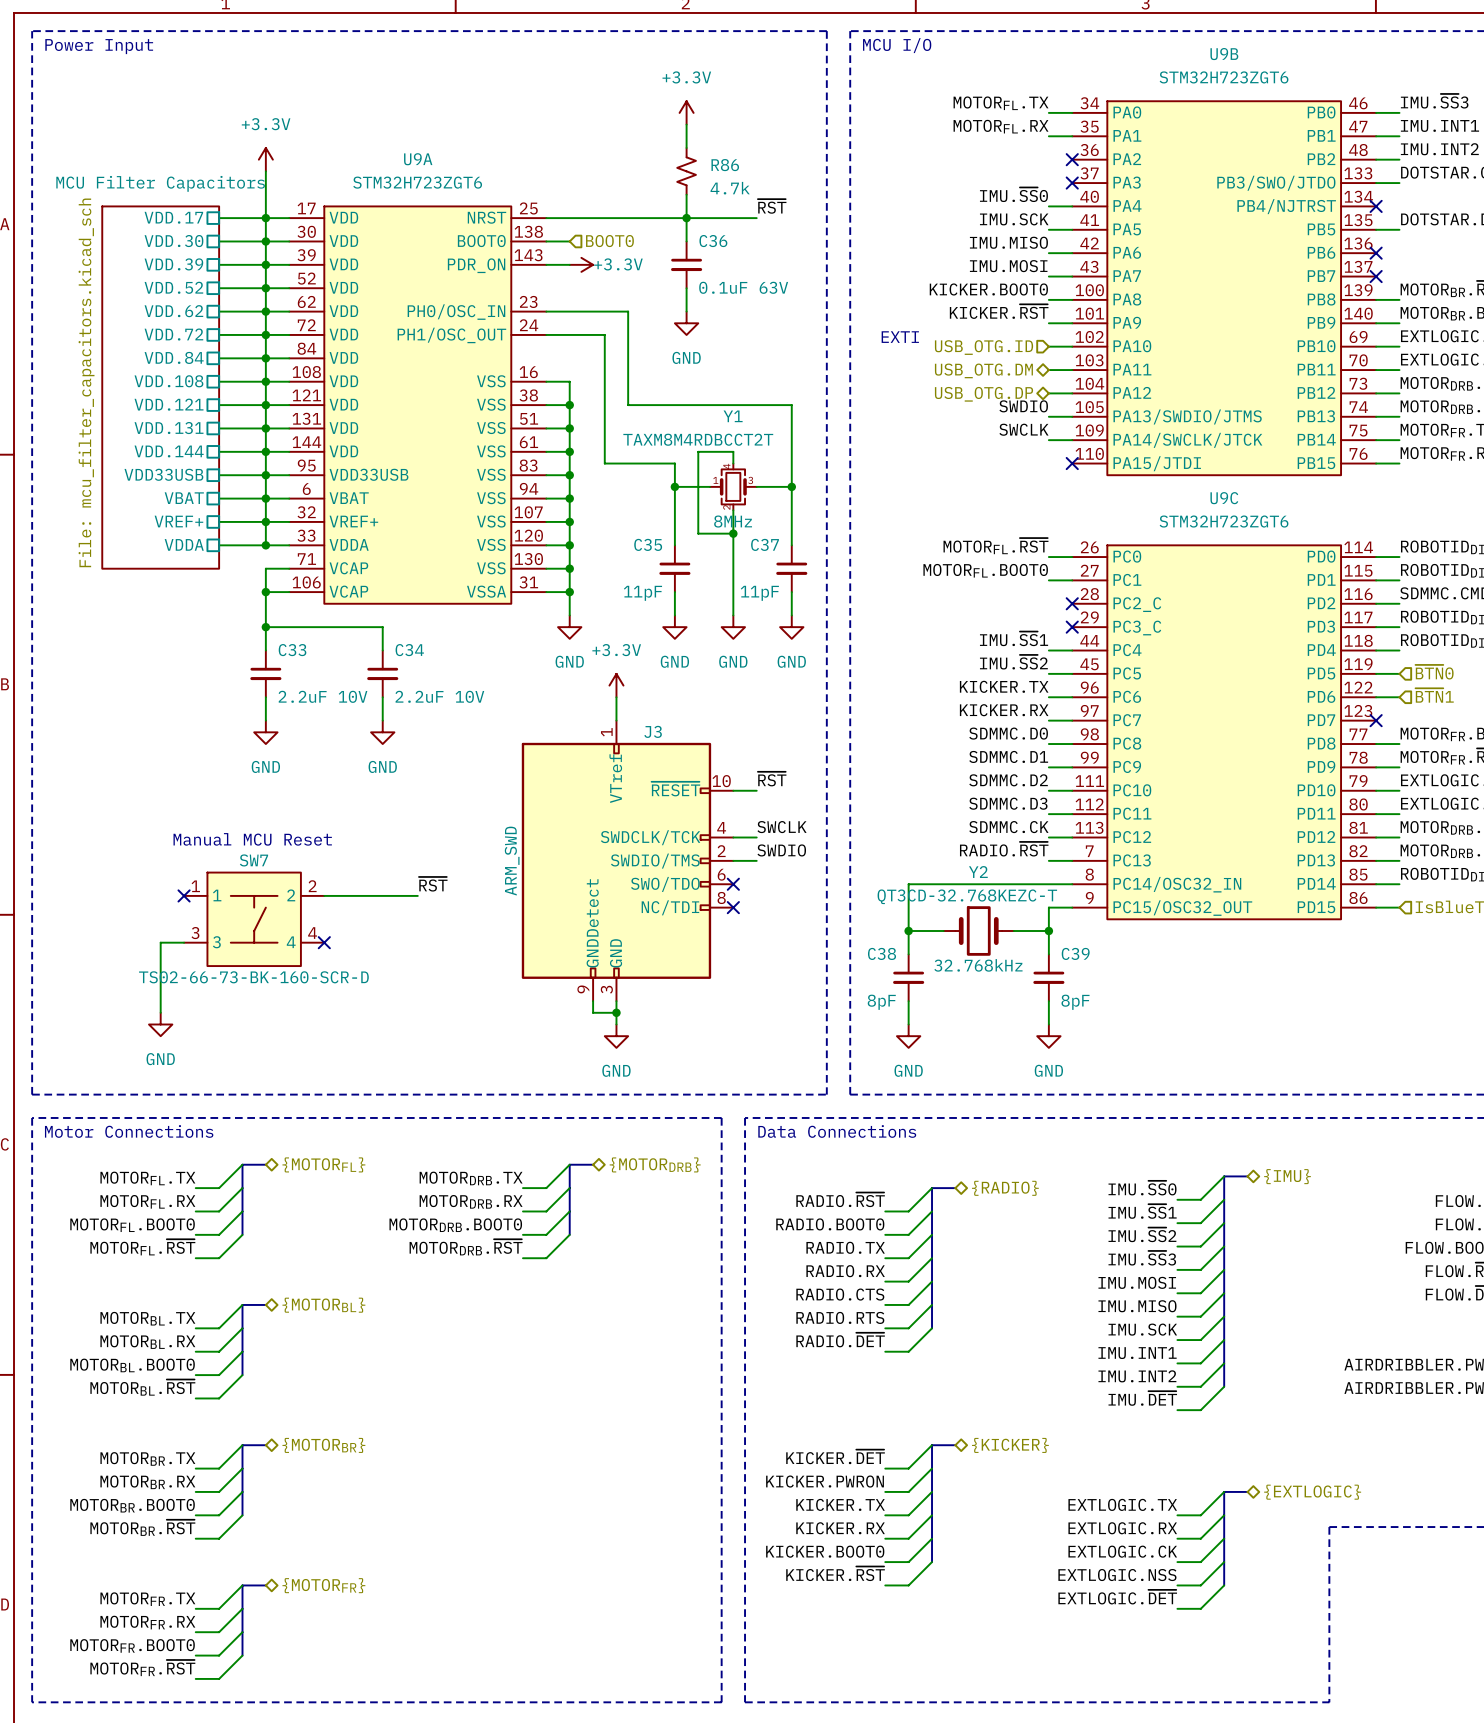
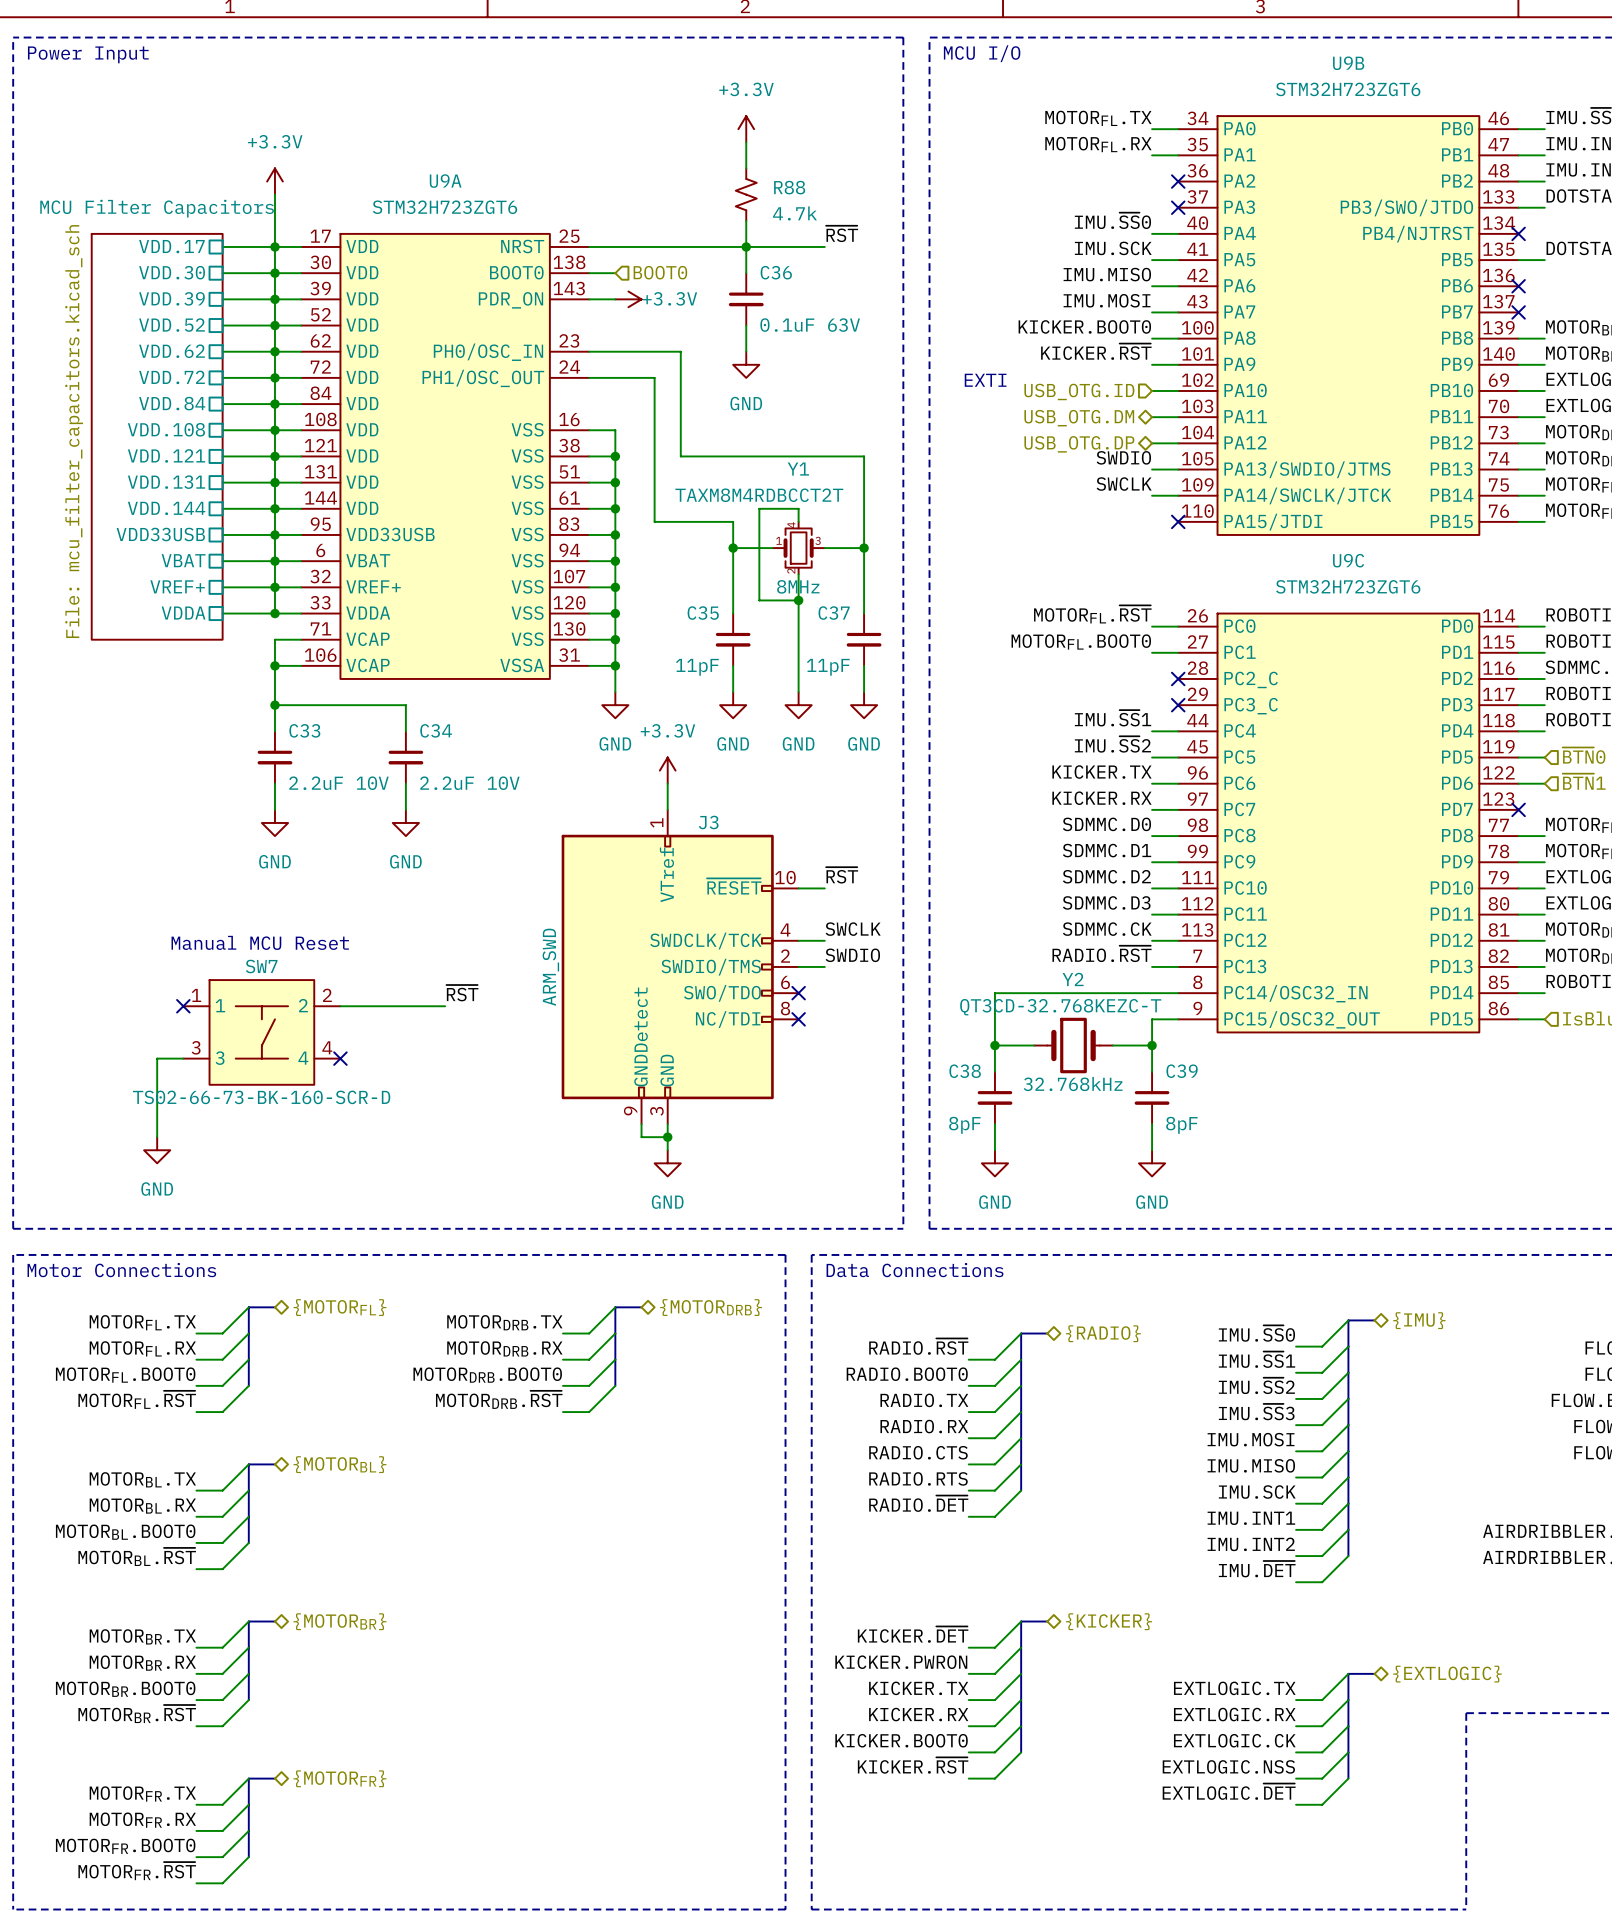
R86 name: R86 (725, 165) -> R88 (789, 187)

